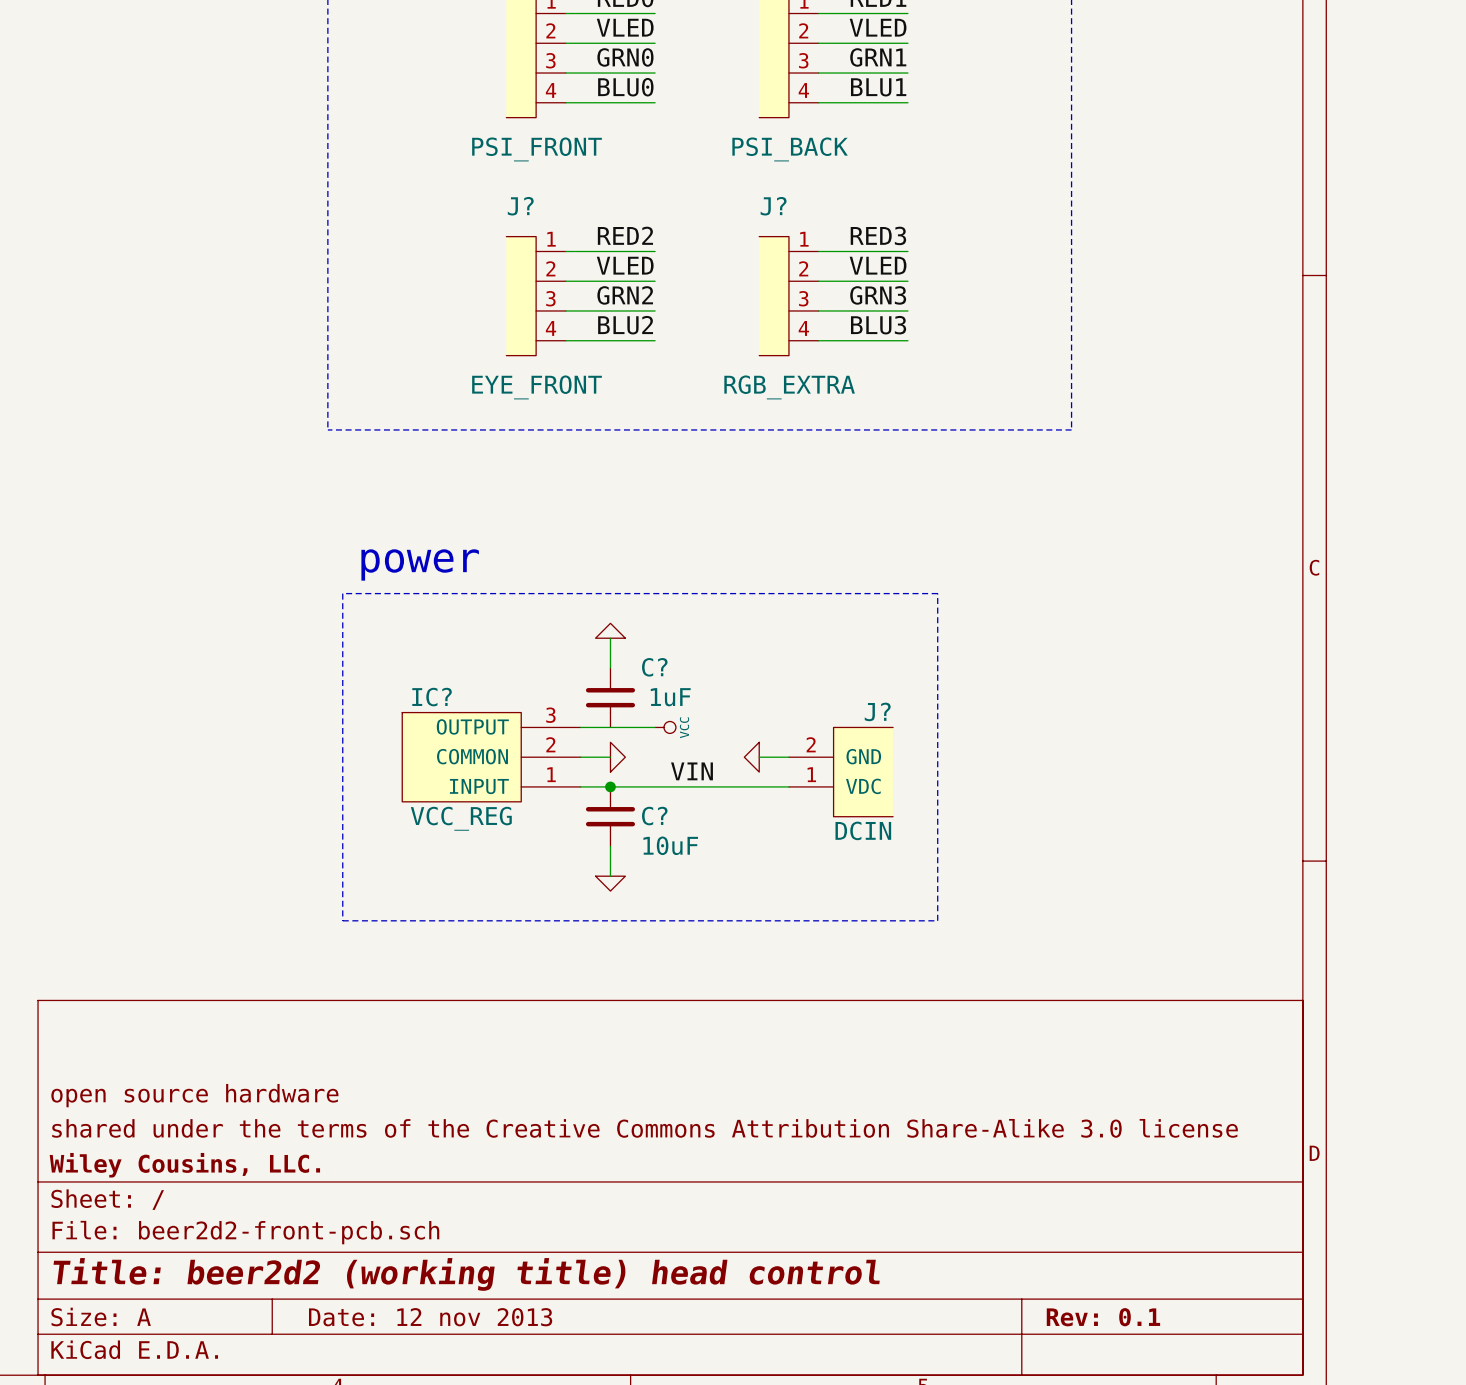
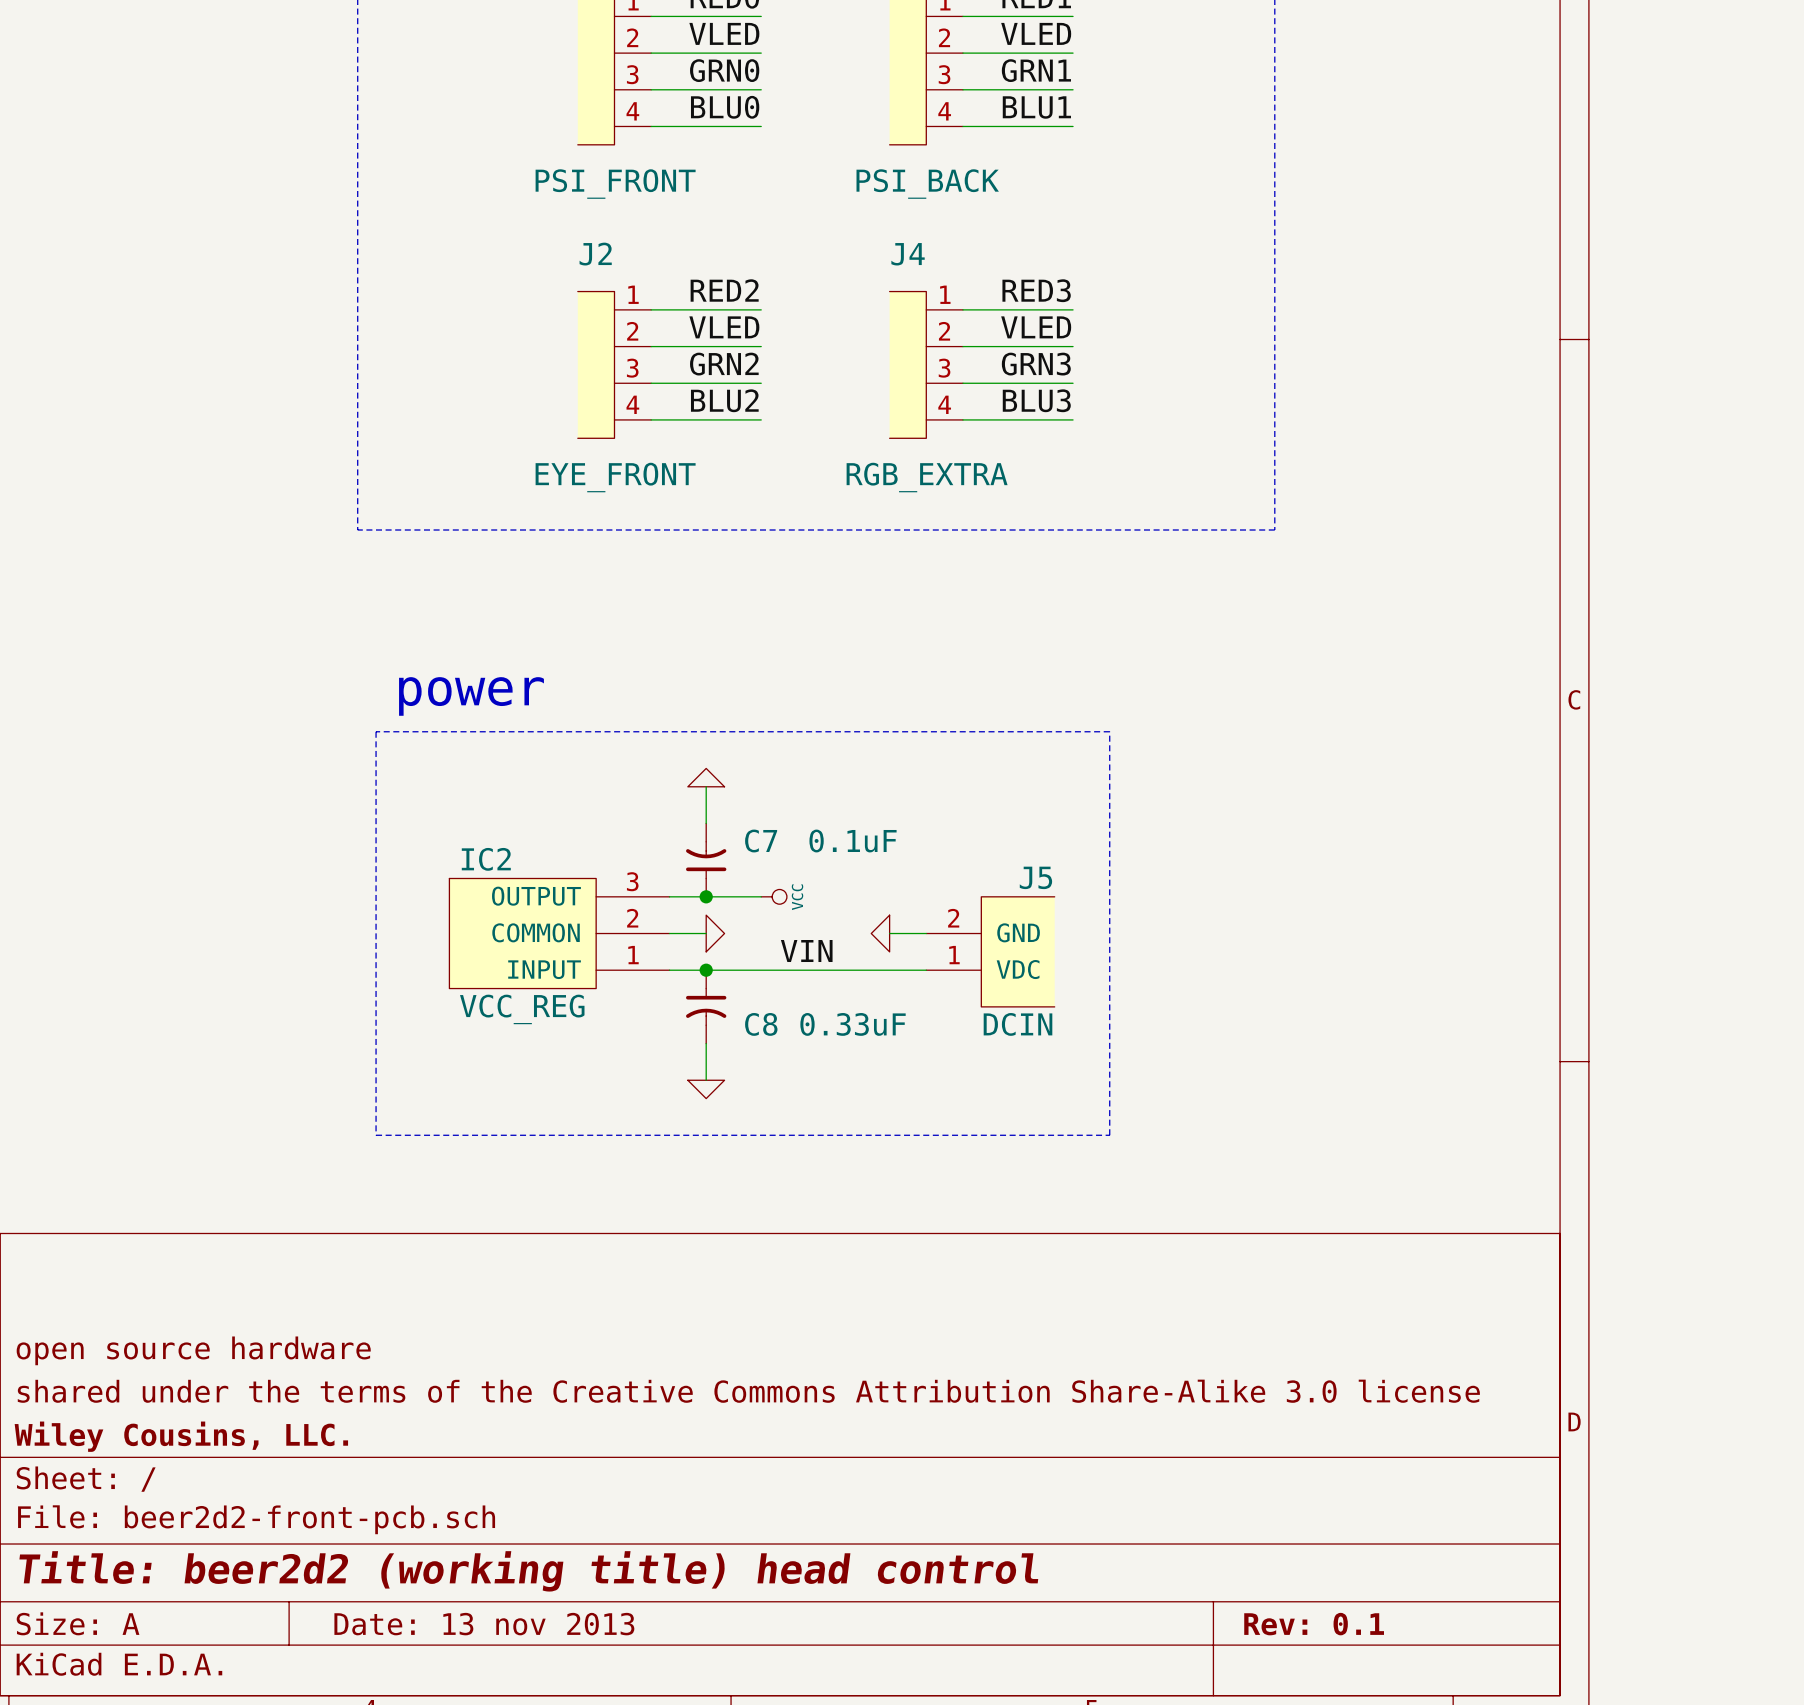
J? name: J? (520, 206) -> J2 (595, 254)
J? name: J? (773, 206) -> J4 (908, 254)
IC? name: IC? (432, 697) -> IC2 (486, 859)
C?: 1uF (610, 697) -> none
C7: none -> 0.1uF (706, 860)
J? name: J? (877, 711) -> J5 (1035, 877)
junction: none -> (706, 896)
C?: 10uF (610, 816) -> none
C8: none -> 0.33uF (706, 1006)
title block: Date: 12 nov 2013 (430, 1317) -> Date: 13 nov 2013 (484, 1624)

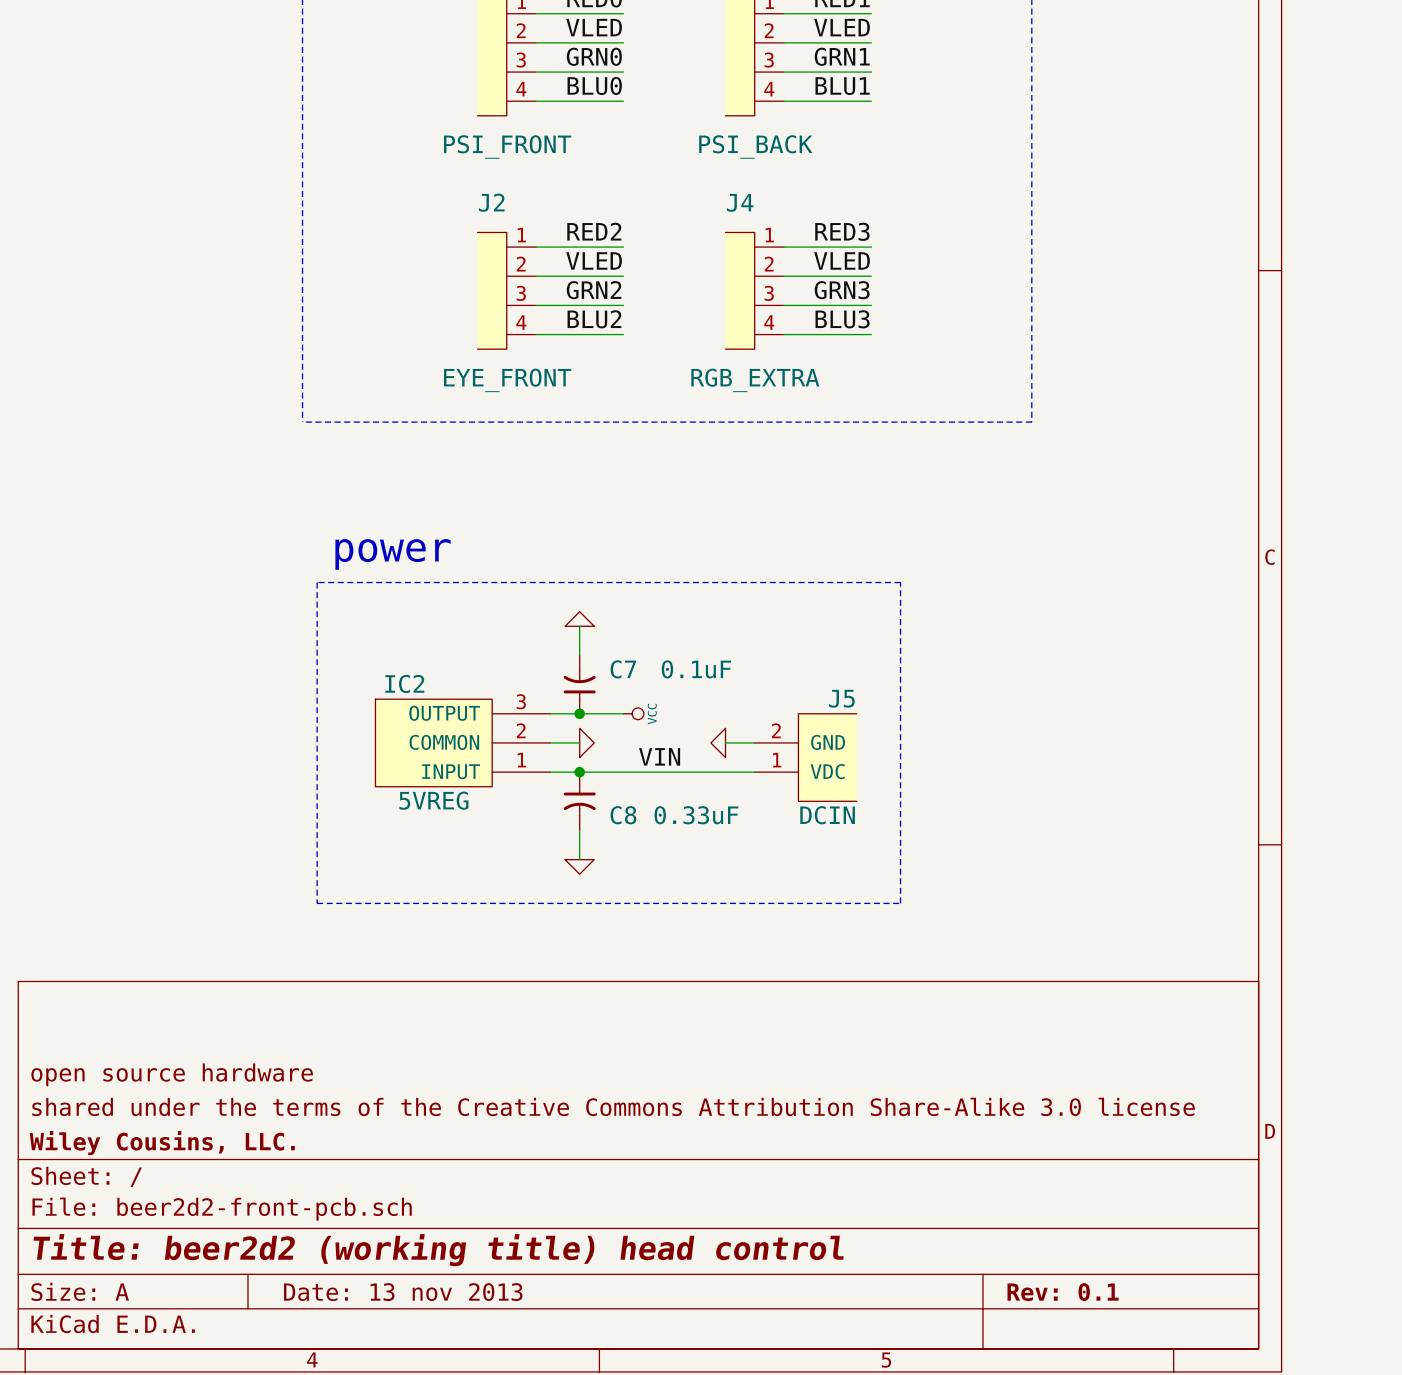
IC2 value: VCC_REG (522, 1009) -> 5VREG (433, 800)

